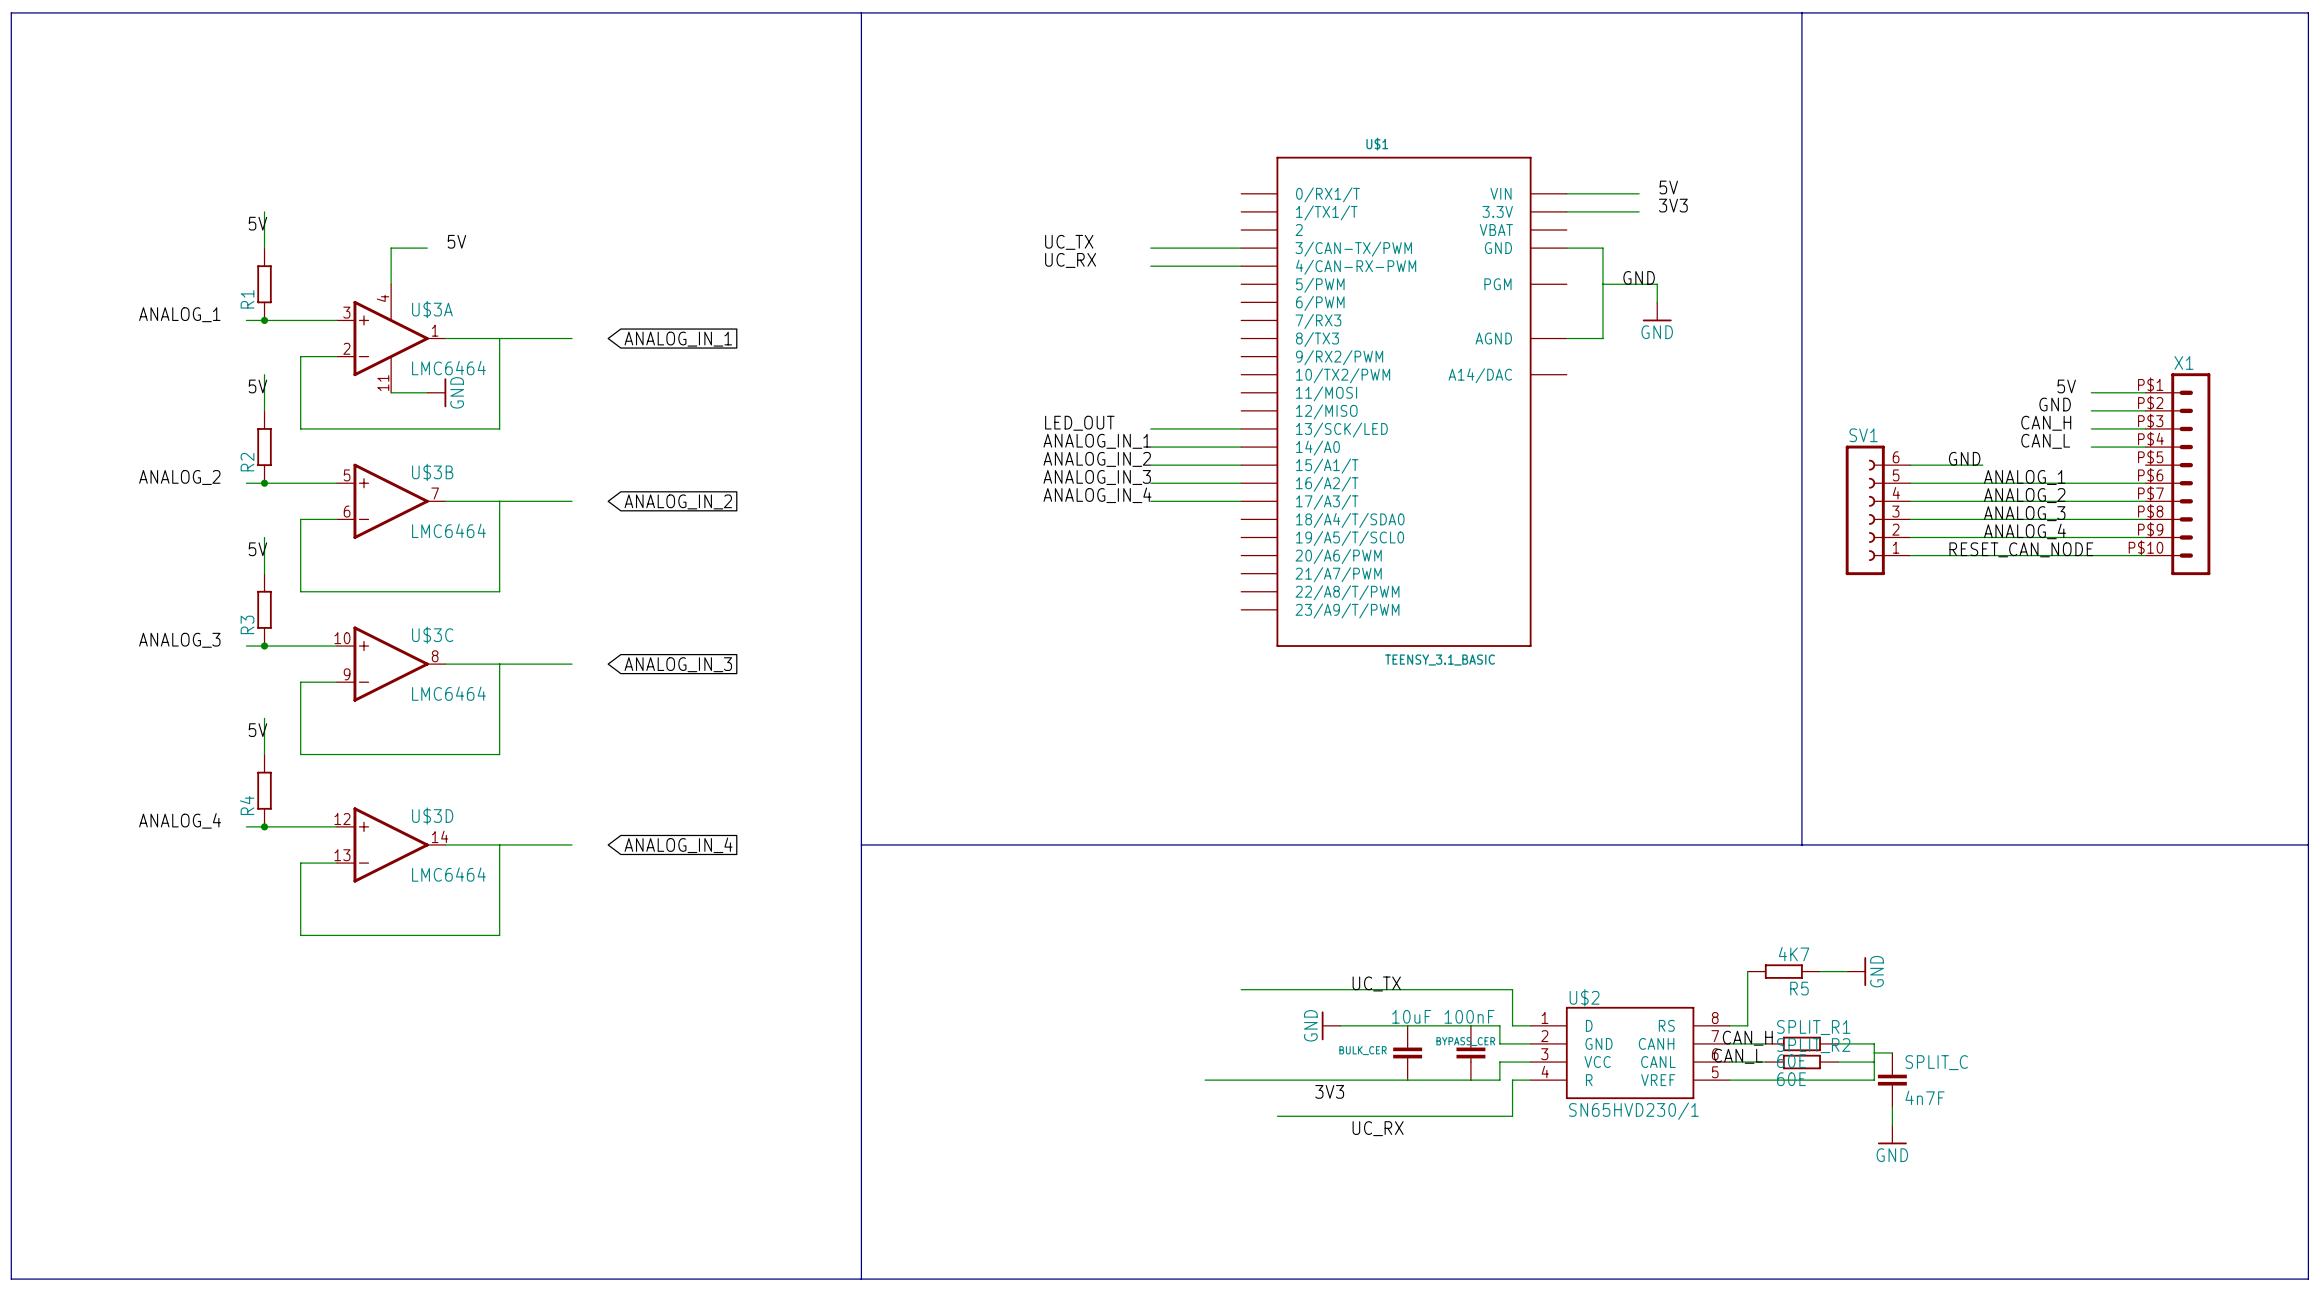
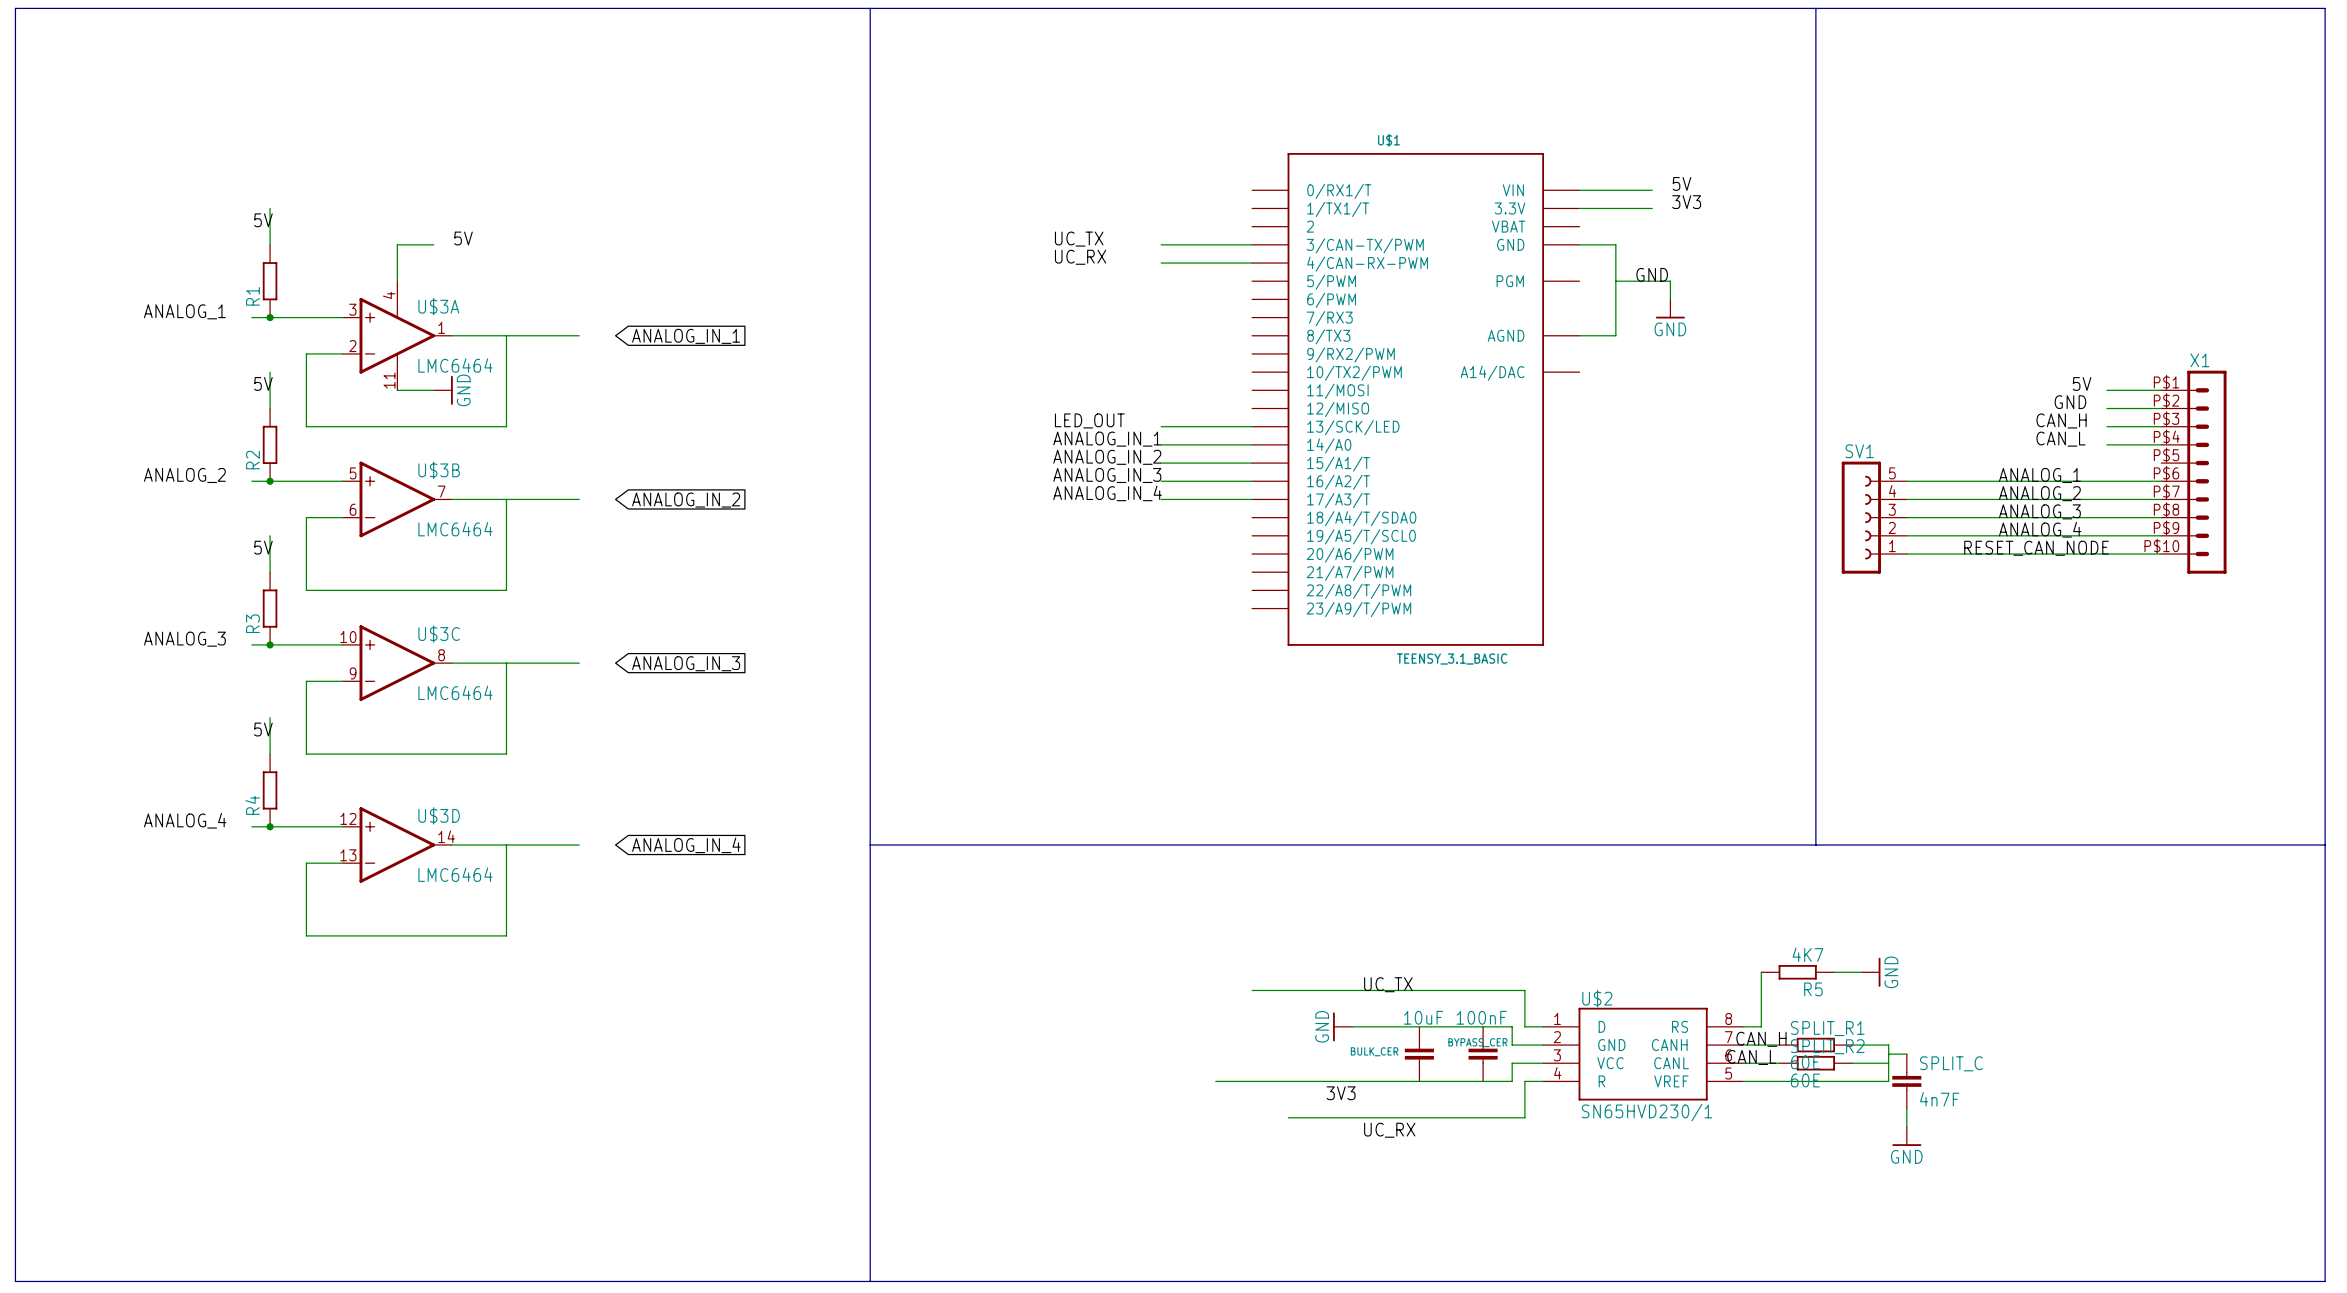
SV1 symbol: [1845, 445, 1911, 576] -> [1841, 461, 1907, 574]
label: GND (1964, 458) -> none
wire: (1910, 465) (1982, 465) -> none

